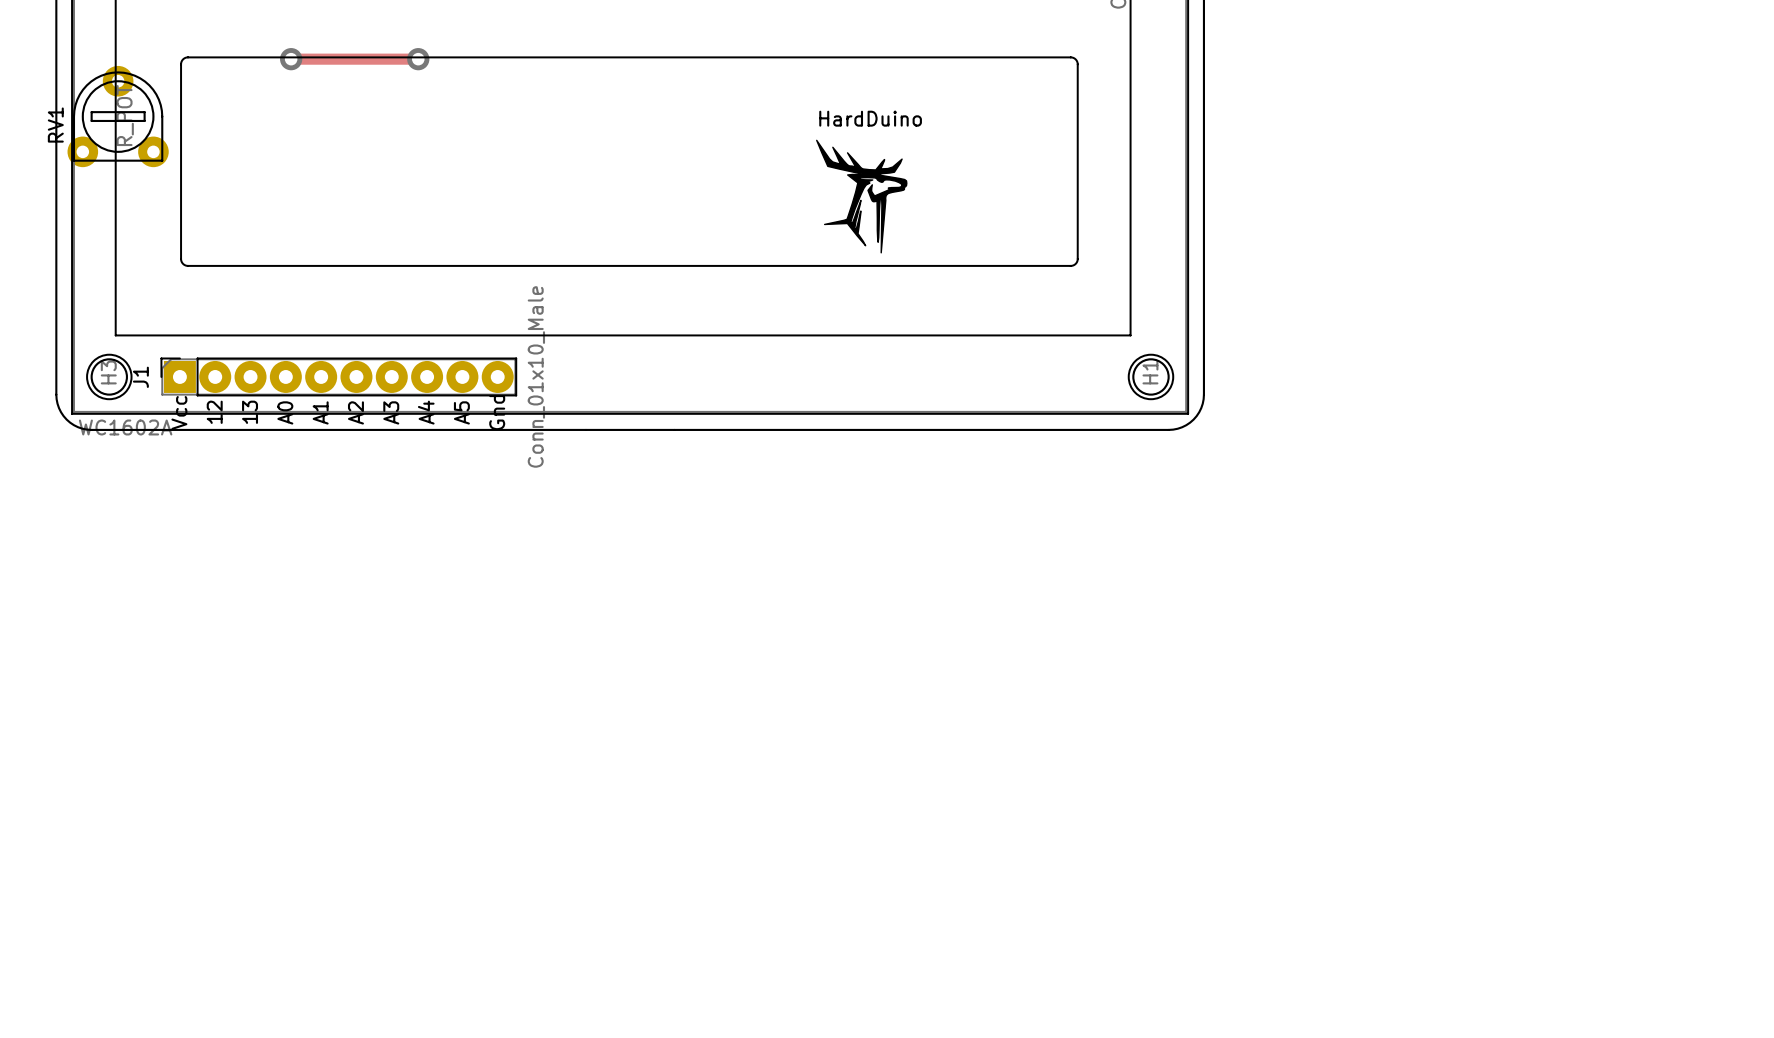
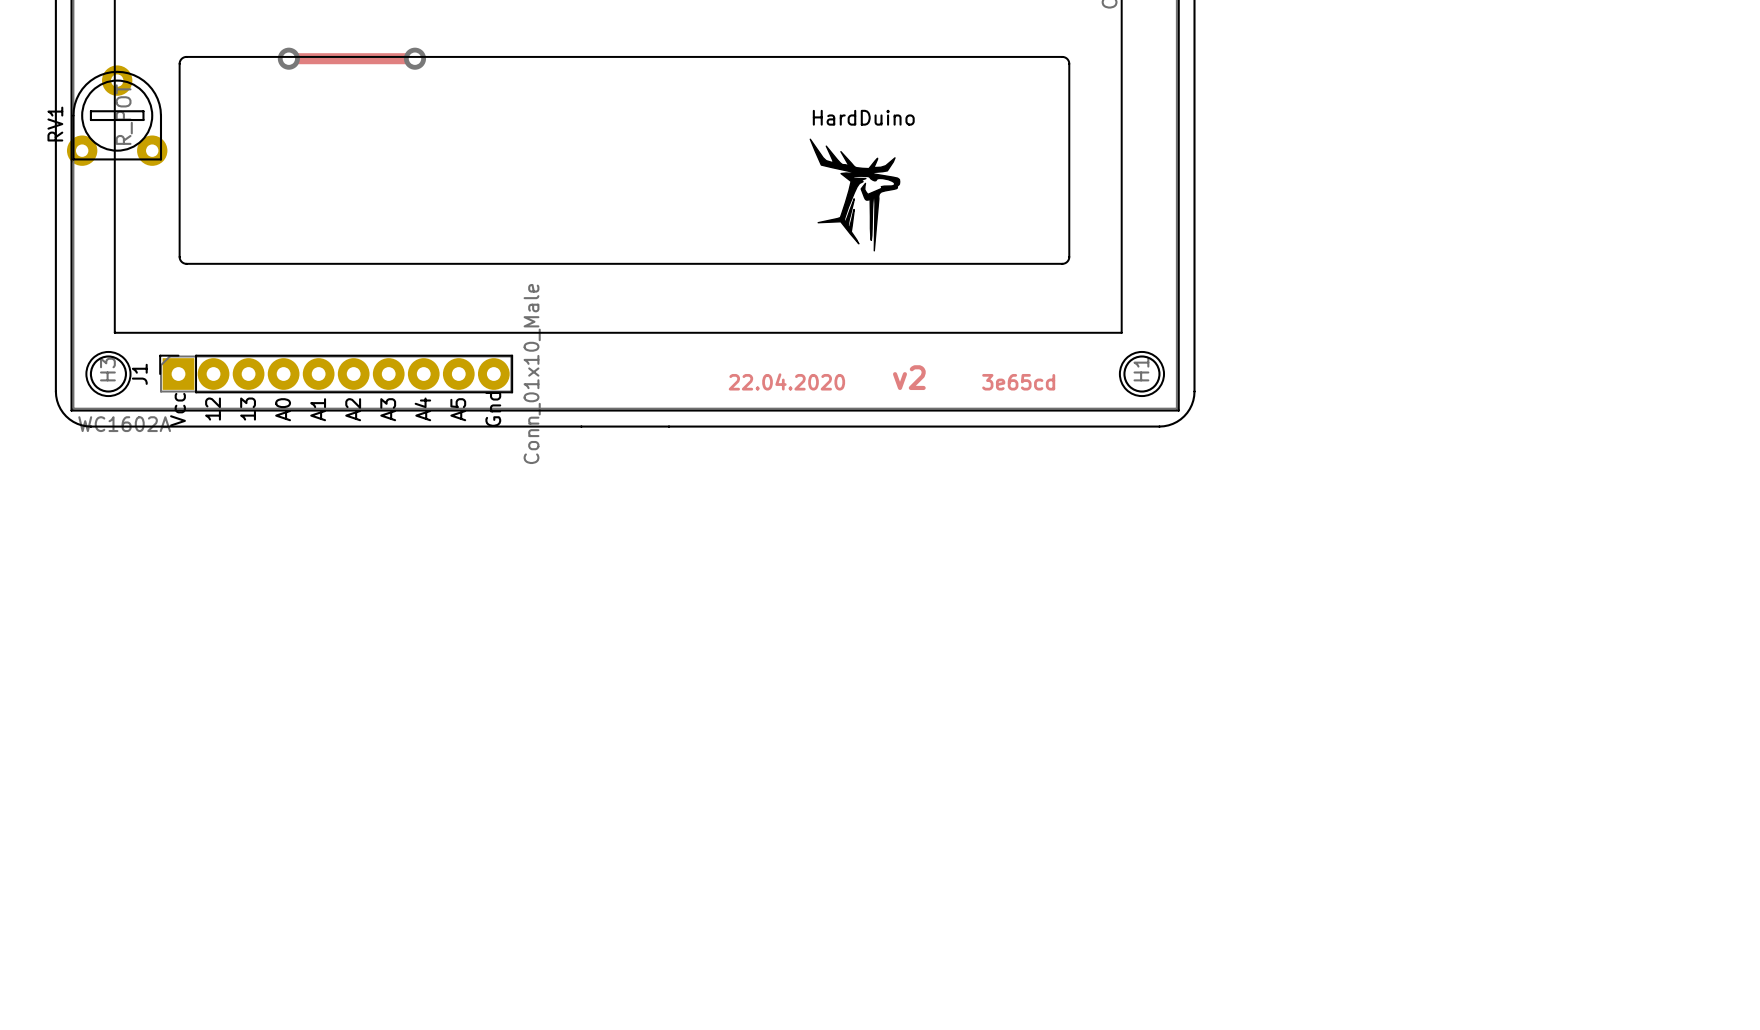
text: none -> v2 (909, 377)
text: none -> 22.04.2020 (786, 381)
text: none -> 3e65cd (1018, 382)

